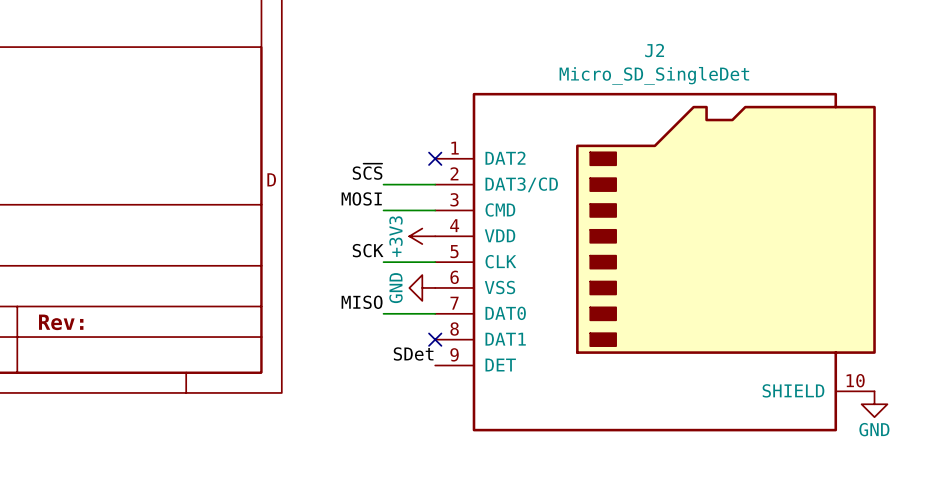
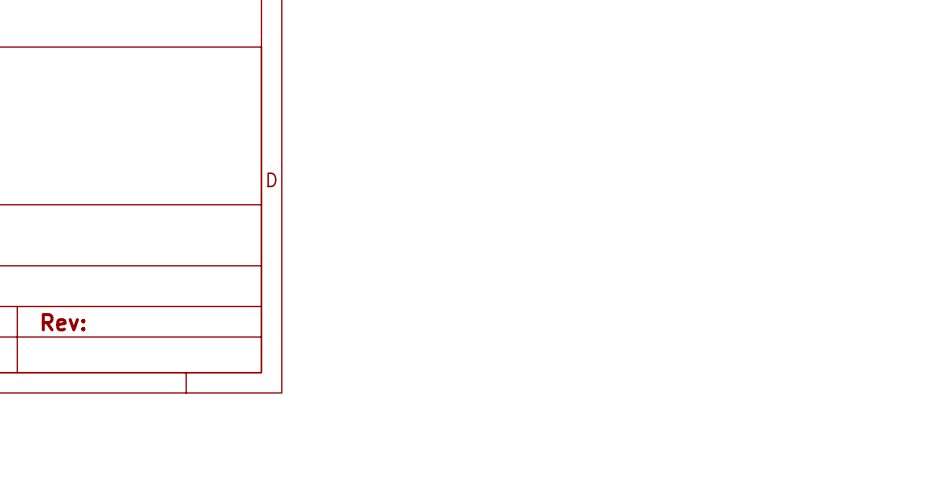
no-connect mark: (435, 158) -> none
label: S~{CS} (367, 171) -> none
wire: (383, 184) (435, 184) -> none
label: MOSI (361, 198) -> none
wire: (383, 210) (435, 210) -> none
power symbol: +3V3 (422, 236) -> none
label: SCK (368, 250) -> none
wire: (383, 262) (435, 262) -> none
J2: Micro_SD_SingleDet (655, 262) -> none
power symbol: GND (422, 287) -> none
label: MISO (362, 302) -> none
wire: (383, 313) (435, 313) -> none
no-connect mark: (435, 339) -> none
label: SDet (413, 353) -> none
power symbol: GND (874, 404) -> none

